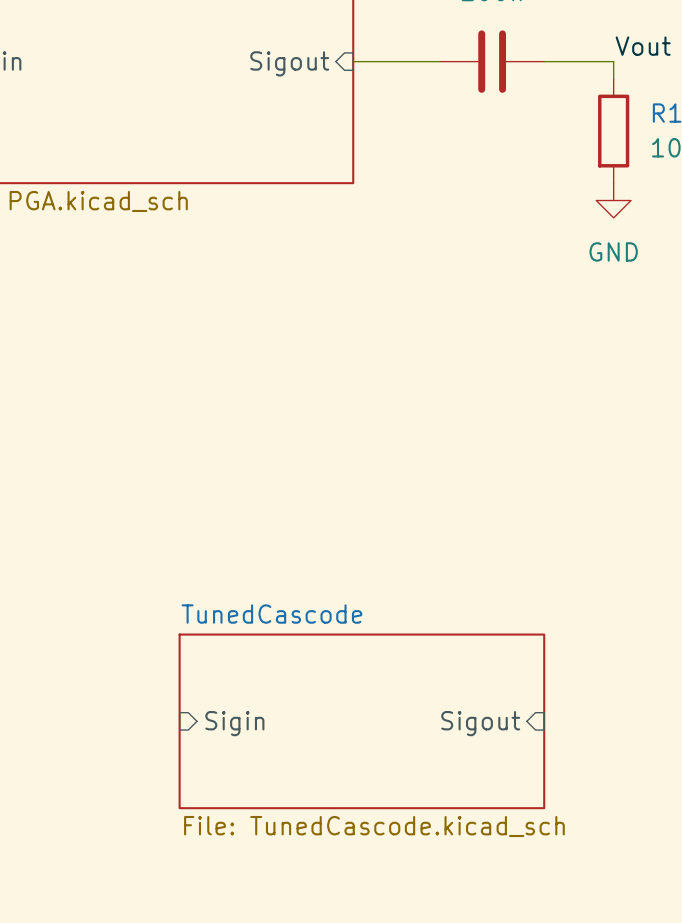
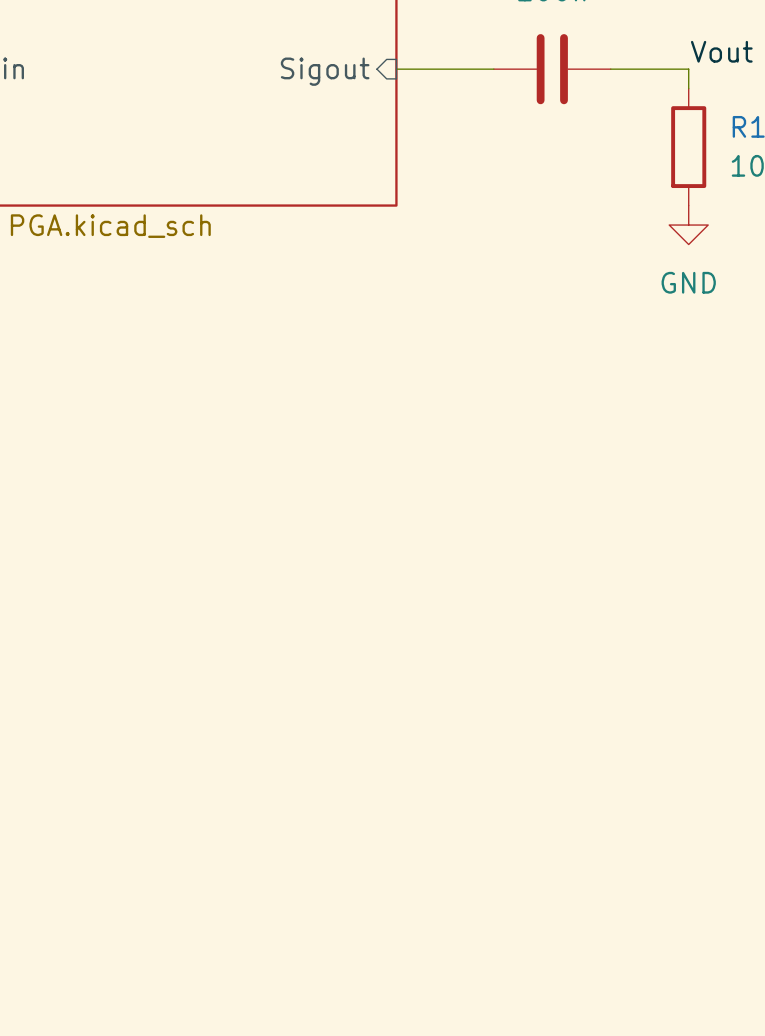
sheet TunedCascode: File: TunedCascode.kicad_sch (361, 721) -> none
sheet pin: Sigin (234, 723) -> none
sheet pin: Sigout (480, 723) -> none

